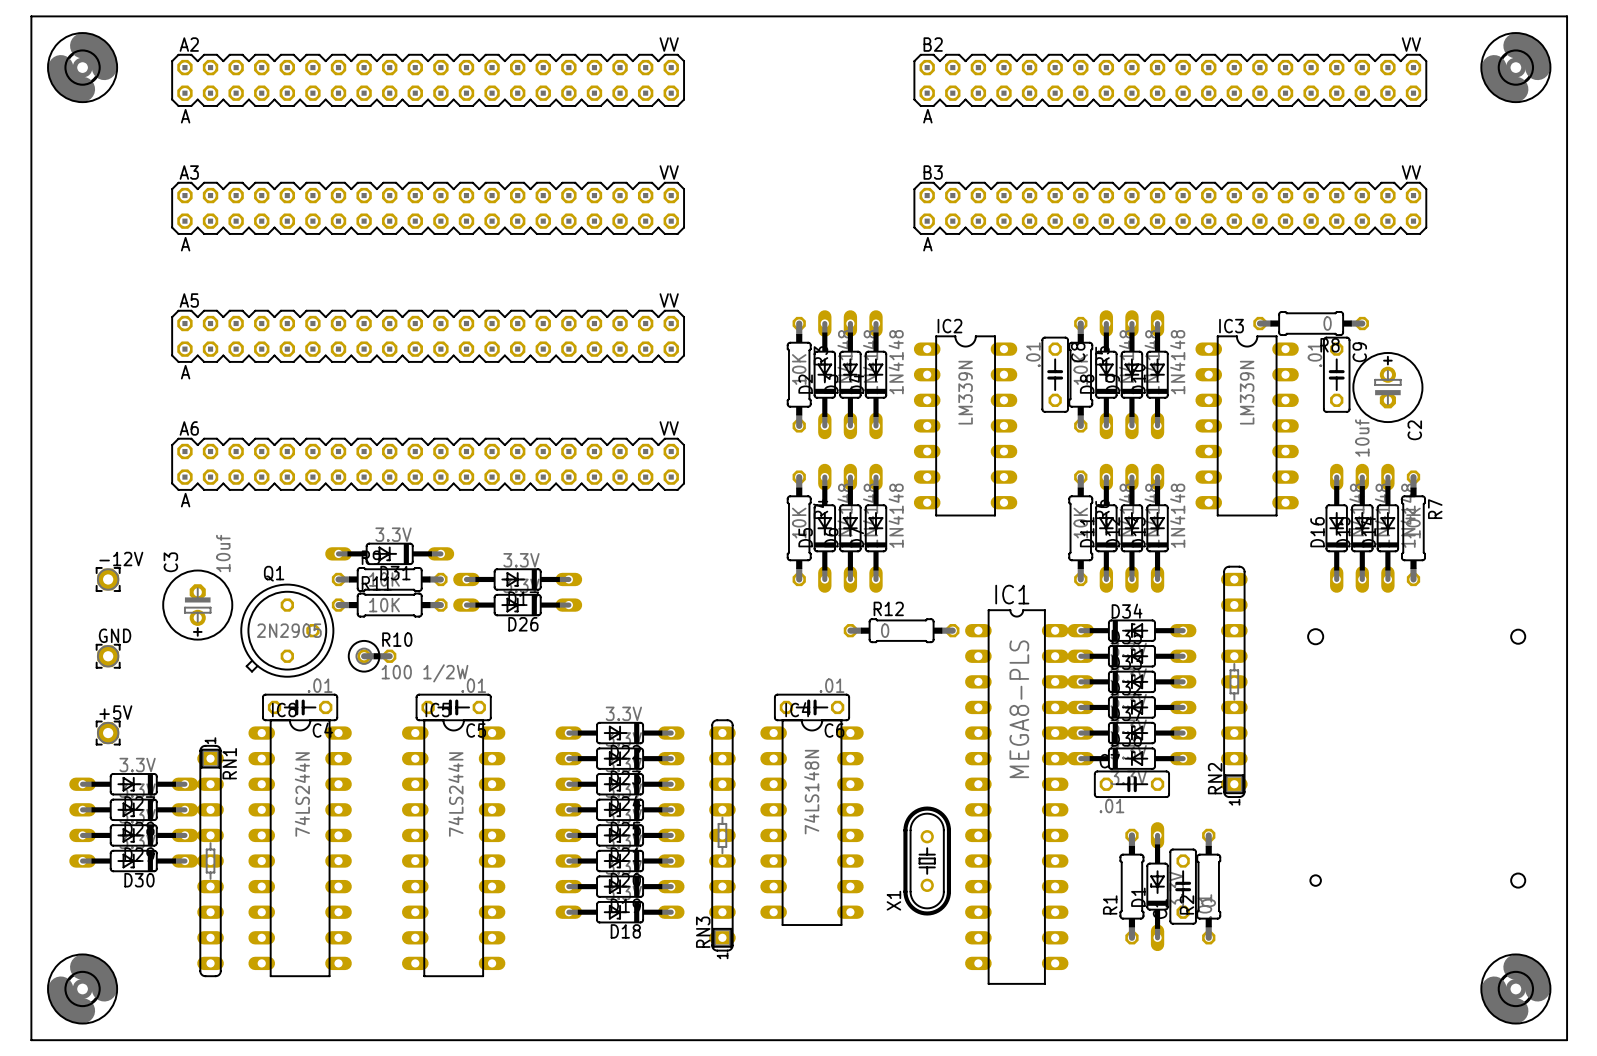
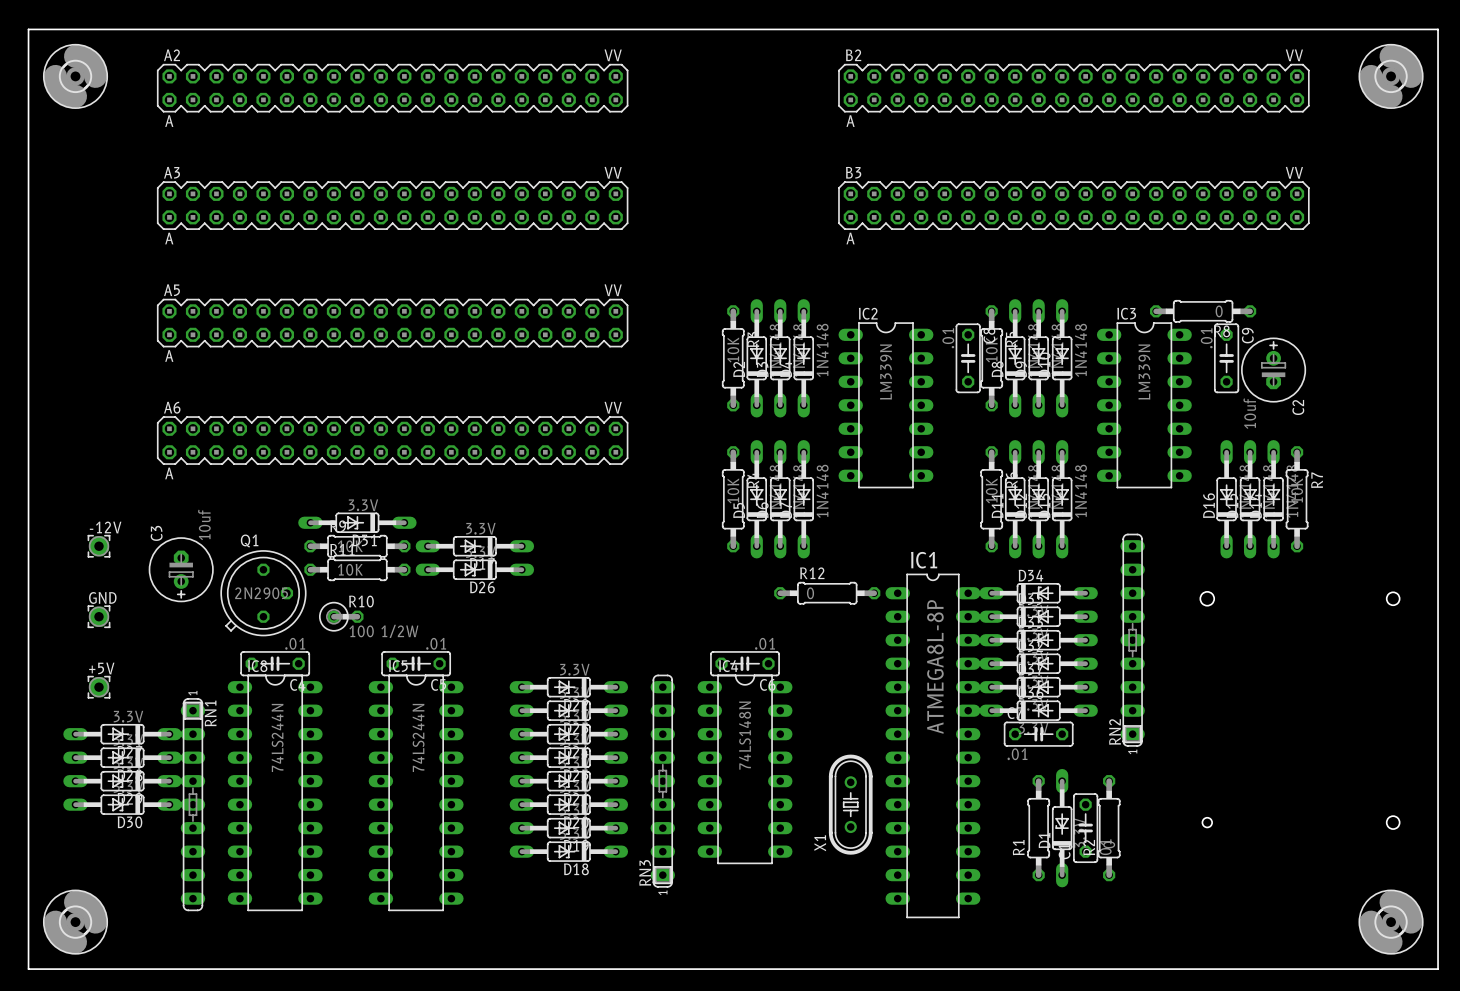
IC1 value: MEGA8-PLS (1019, 709) -> ATMEGA8L-8P (935, 667)

